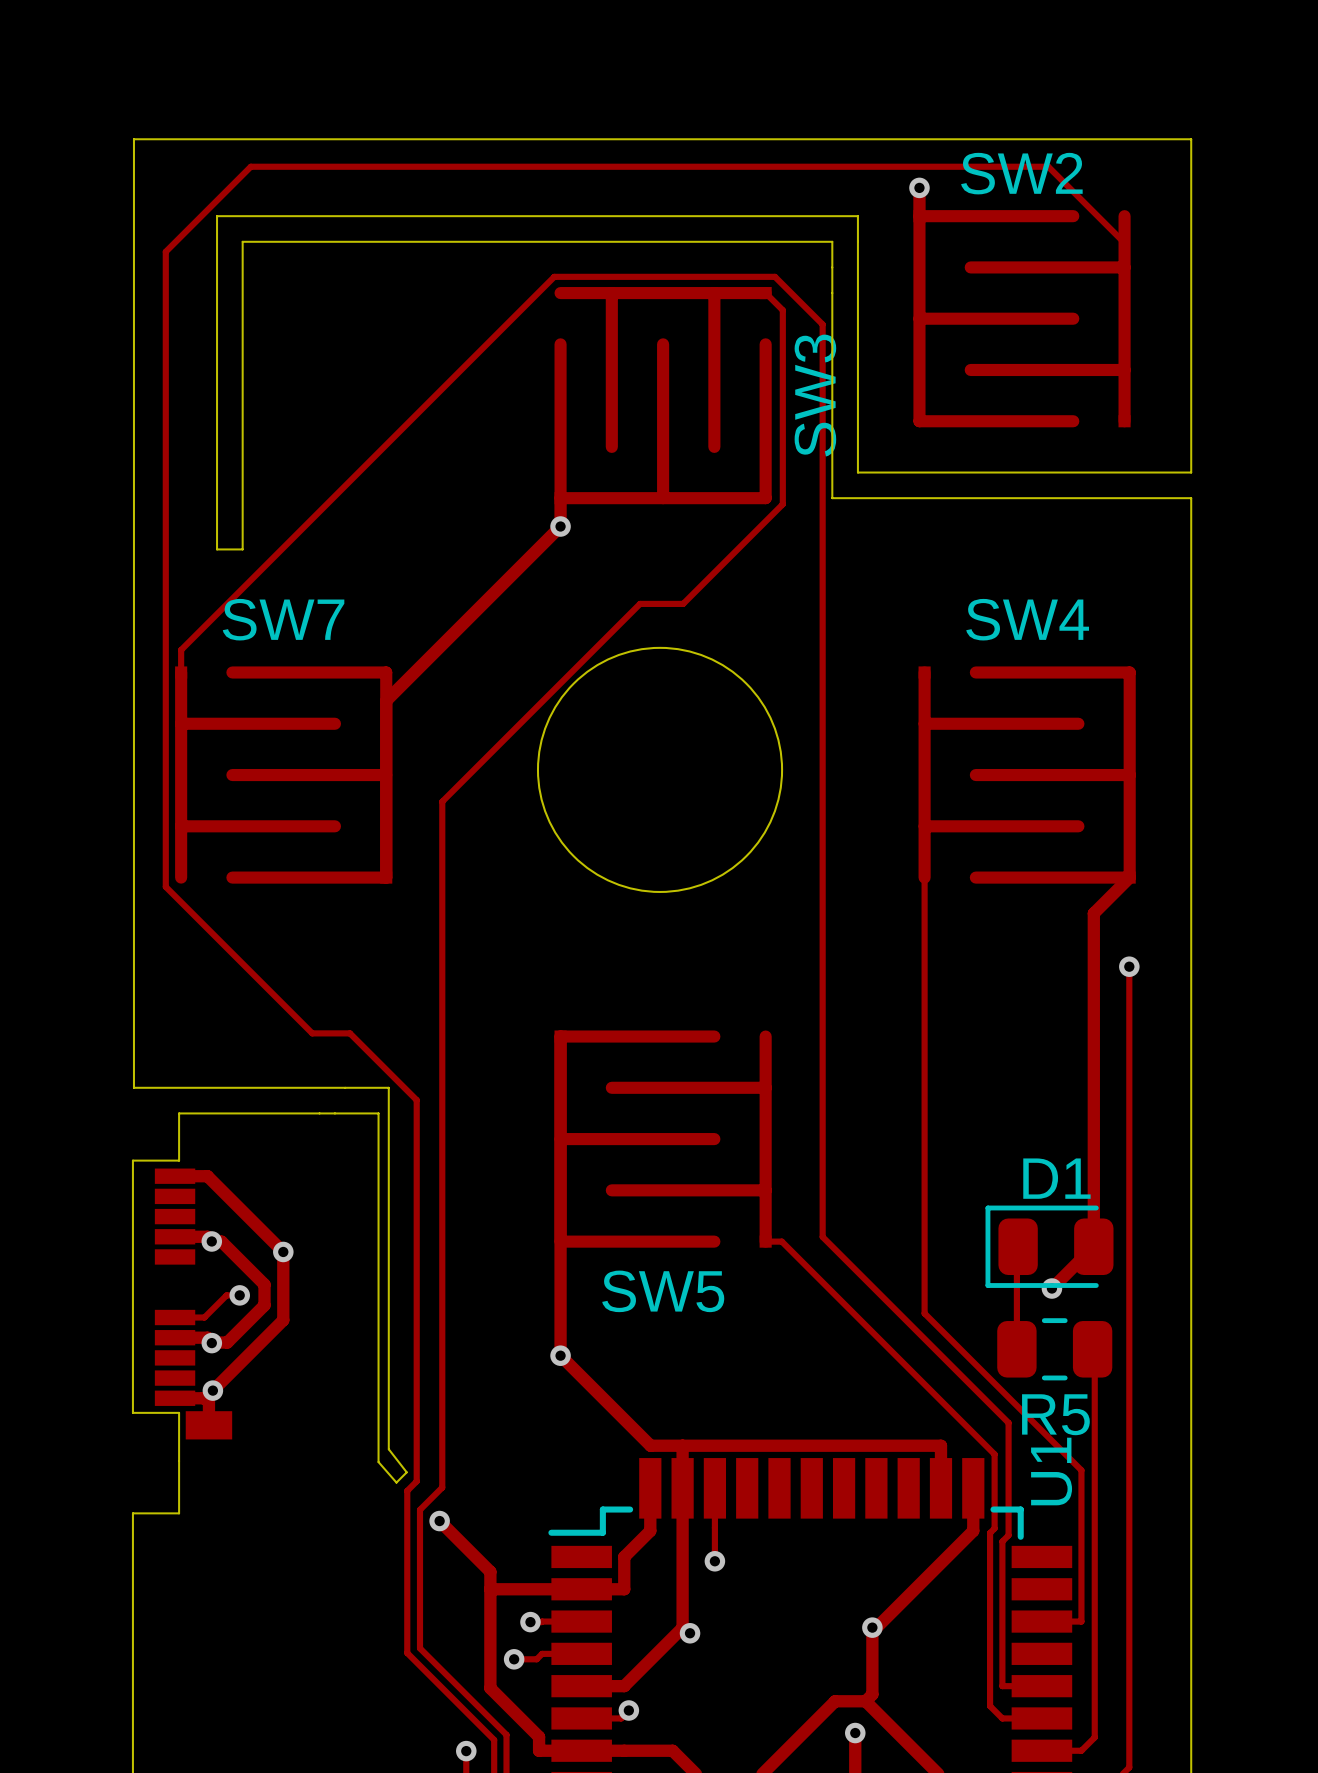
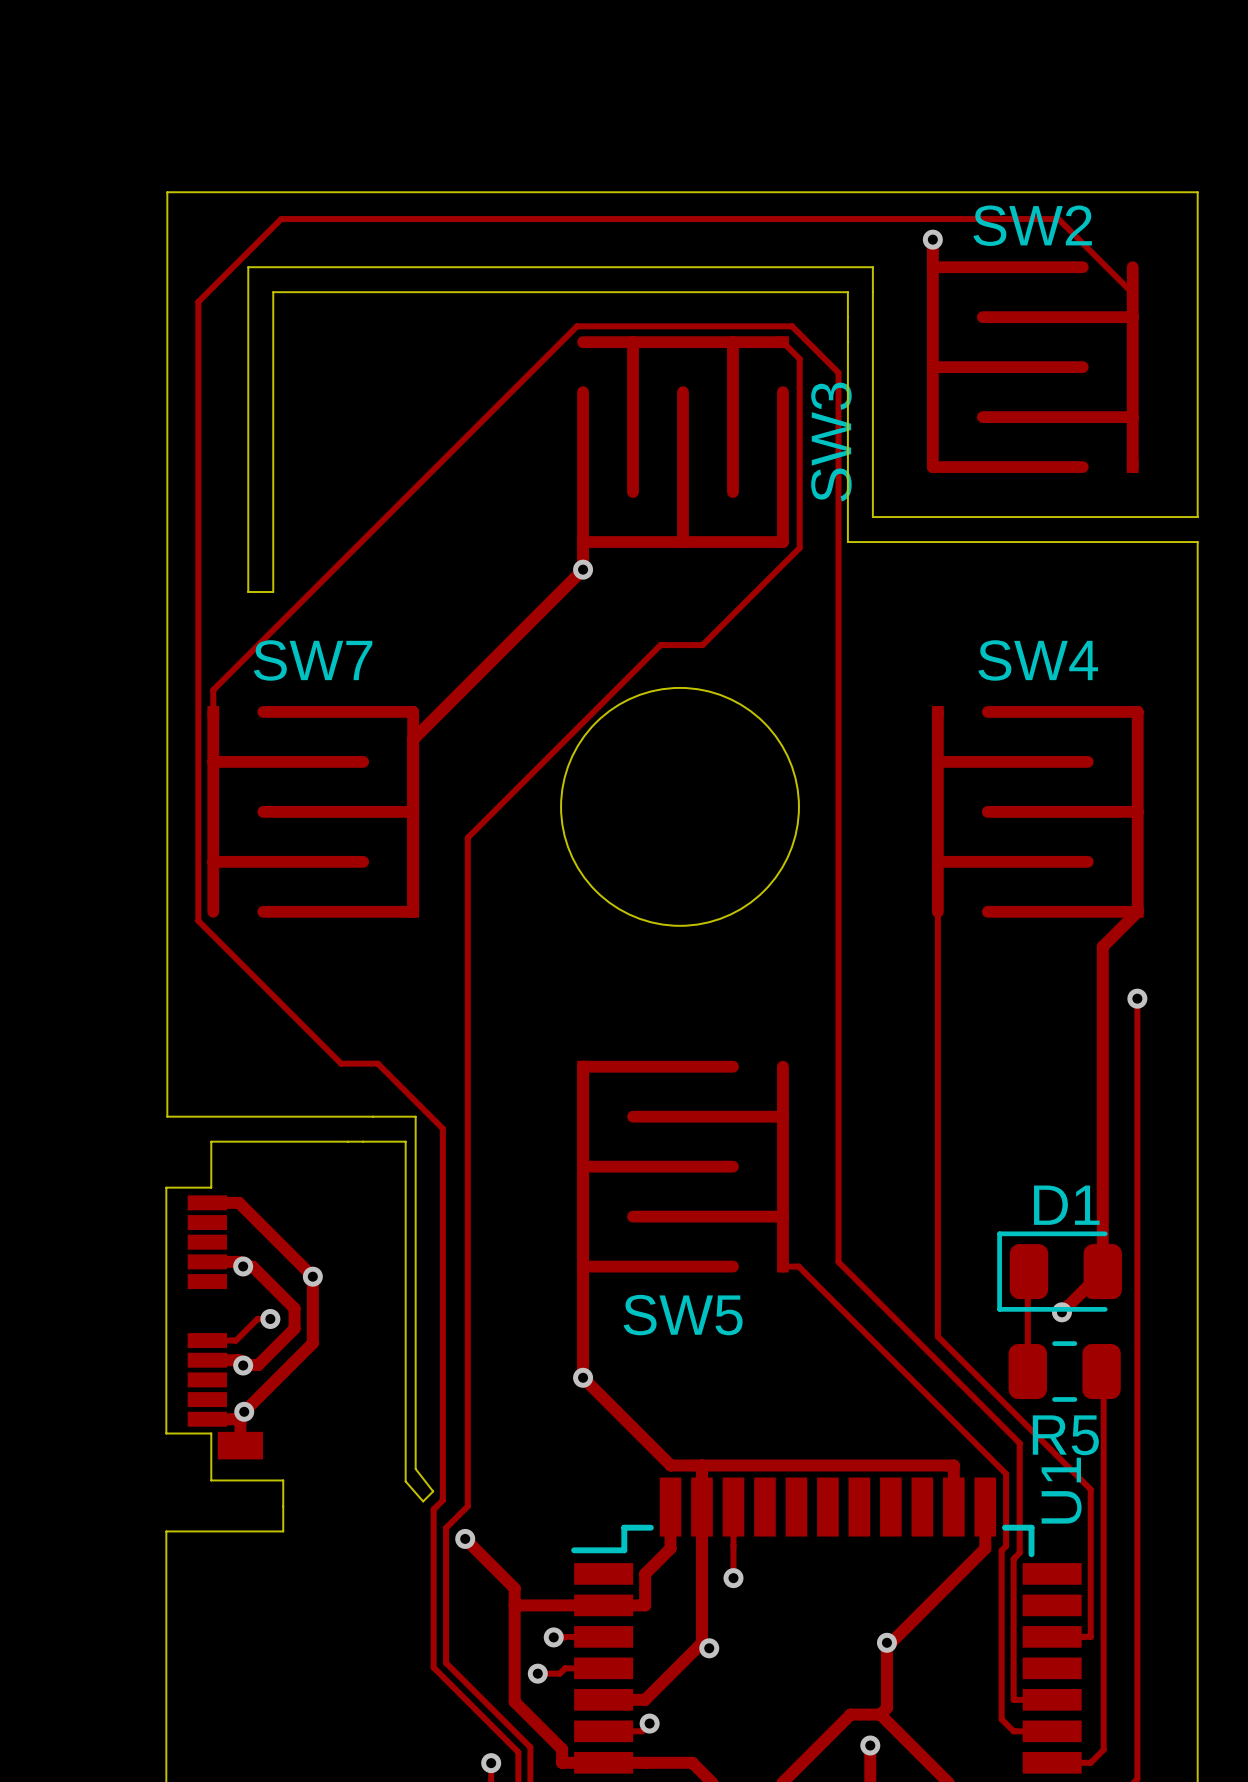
board edge: (179, 1461) (179, 1513) -> (211, 1480) (283, 1480) (283, 1531) (211, 1531)

